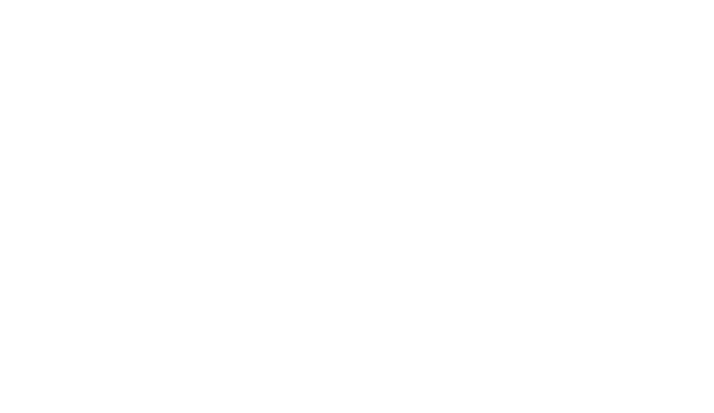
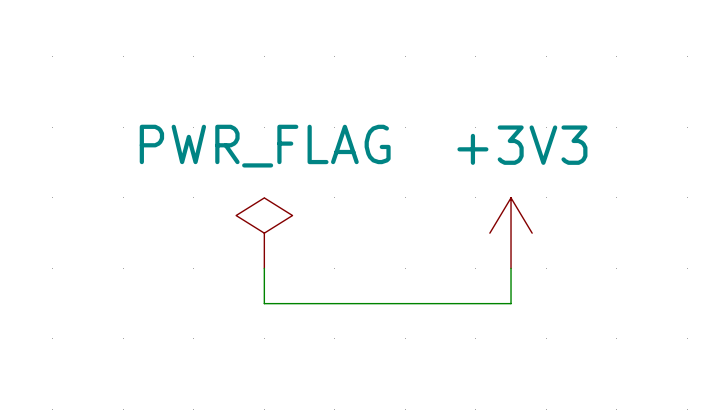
power symbol: none -> PWR_FLAG (264, 233)
power symbol: none -> +3V3 (511, 233)
wire: none -> (264, 268) (264, 303) (511, 303) (511, 268)

